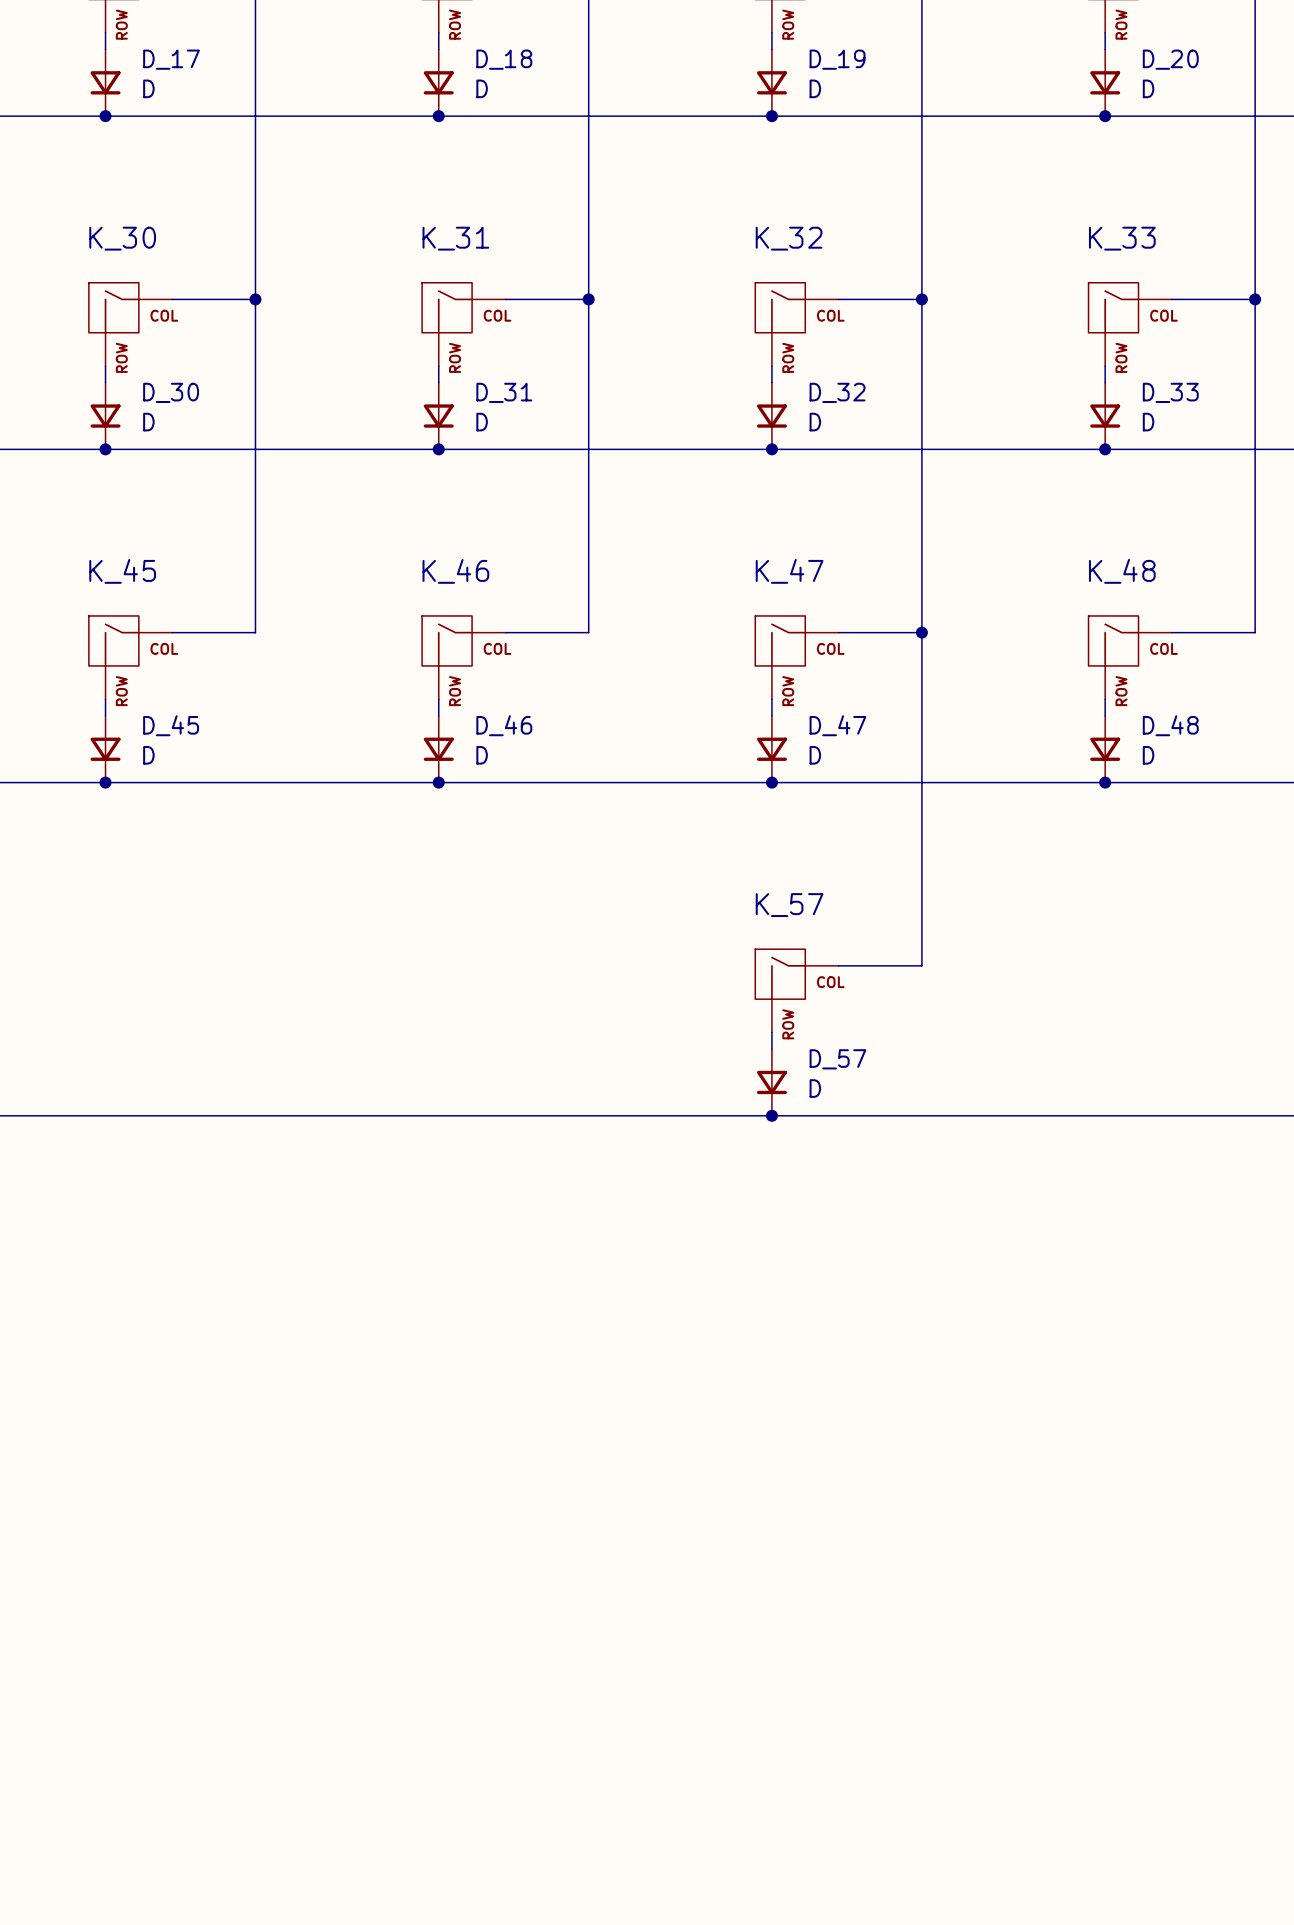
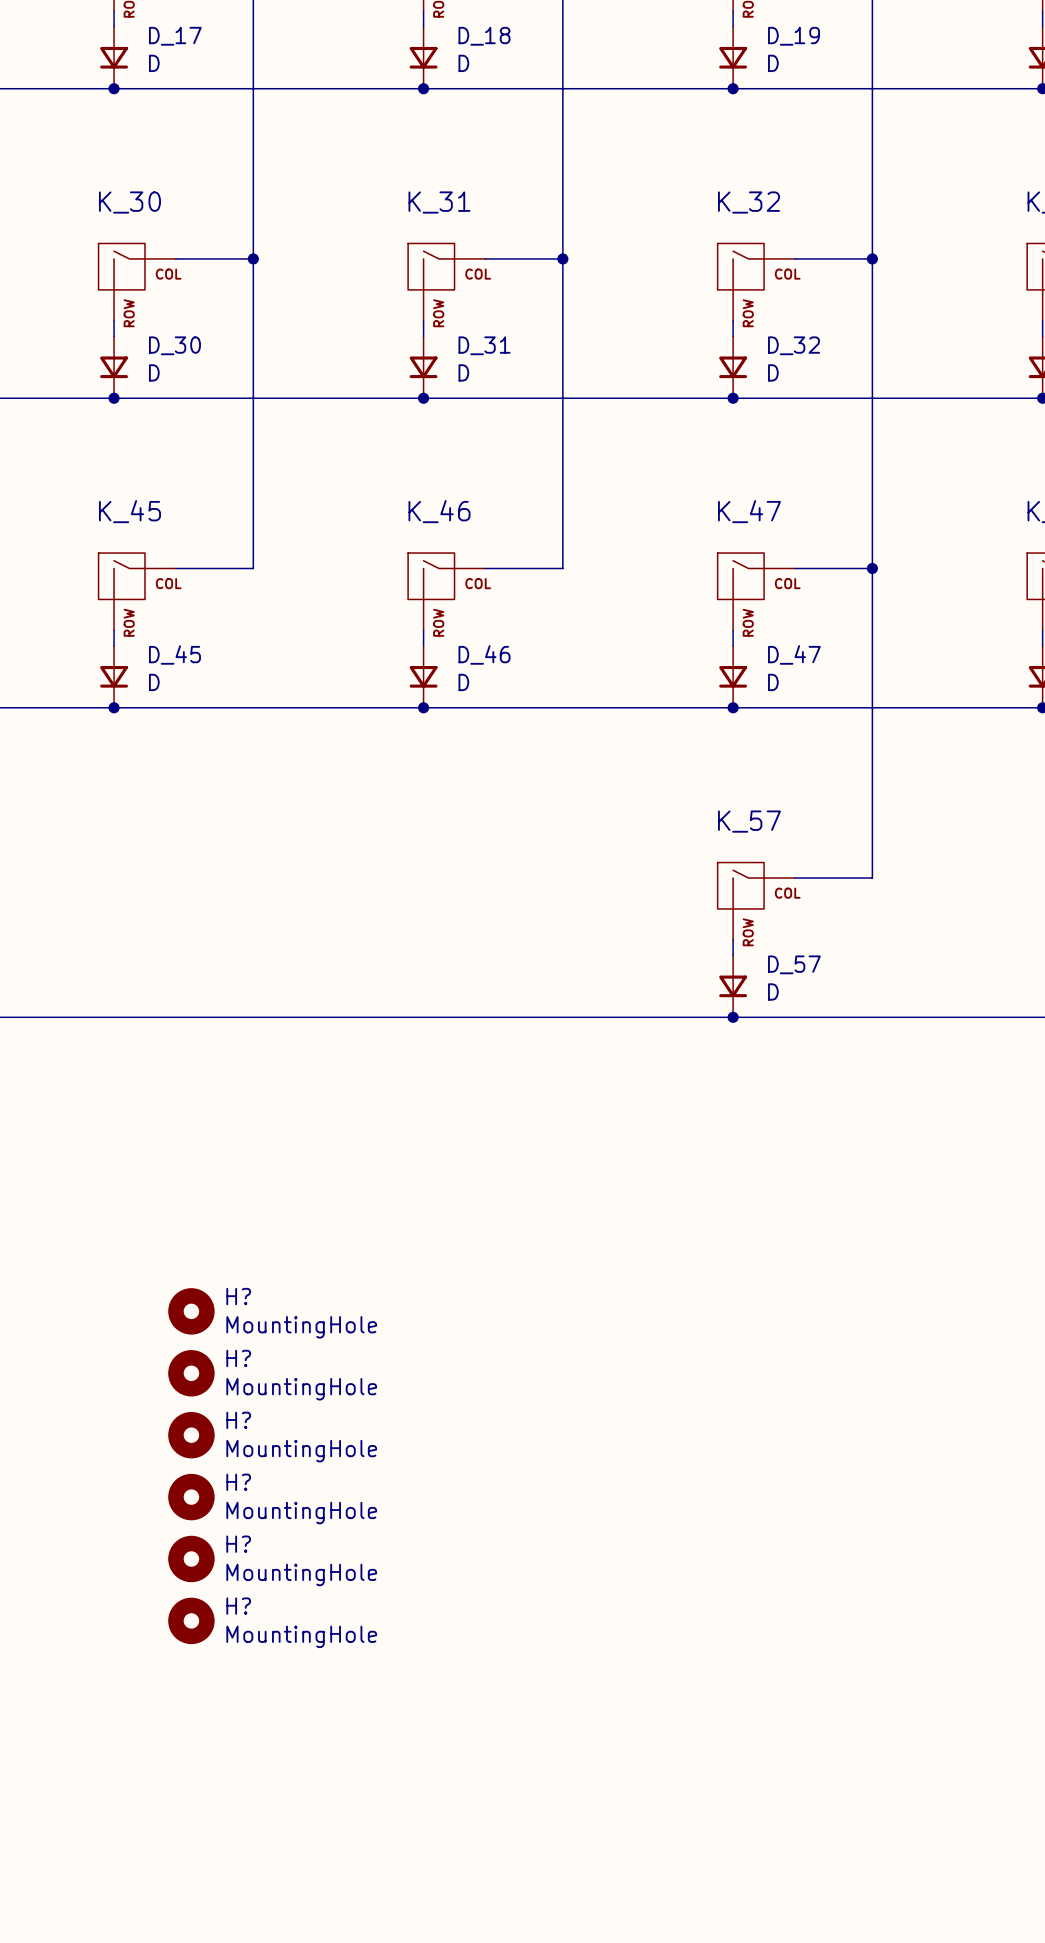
H?: none -> MountingHole (191, 1311)
H?: none -> MountingHole (191, 1373)
H?: none -> MountingHole (191, 1435)
H?: none -> MountingHole (191, 1497)
H?: none -> MountingHole (191, 1559)
H?: none -> MountingHole (191, 1620)

